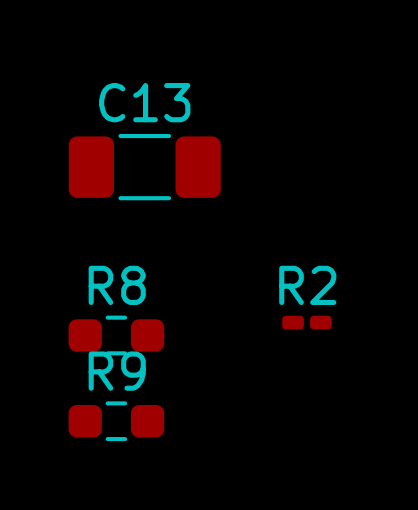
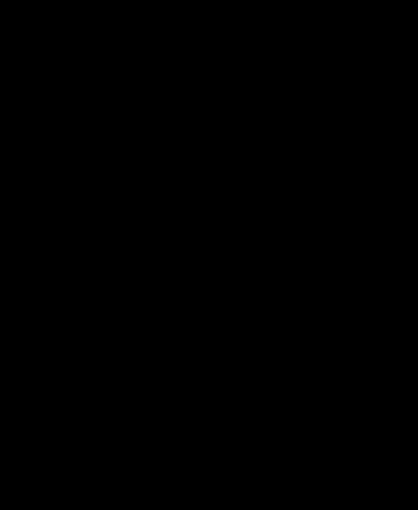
C13: (144, 167) -> none
R2: (306, 322) -> none
R8: (116, 335) -> none
R9: (116, 421) -> none

